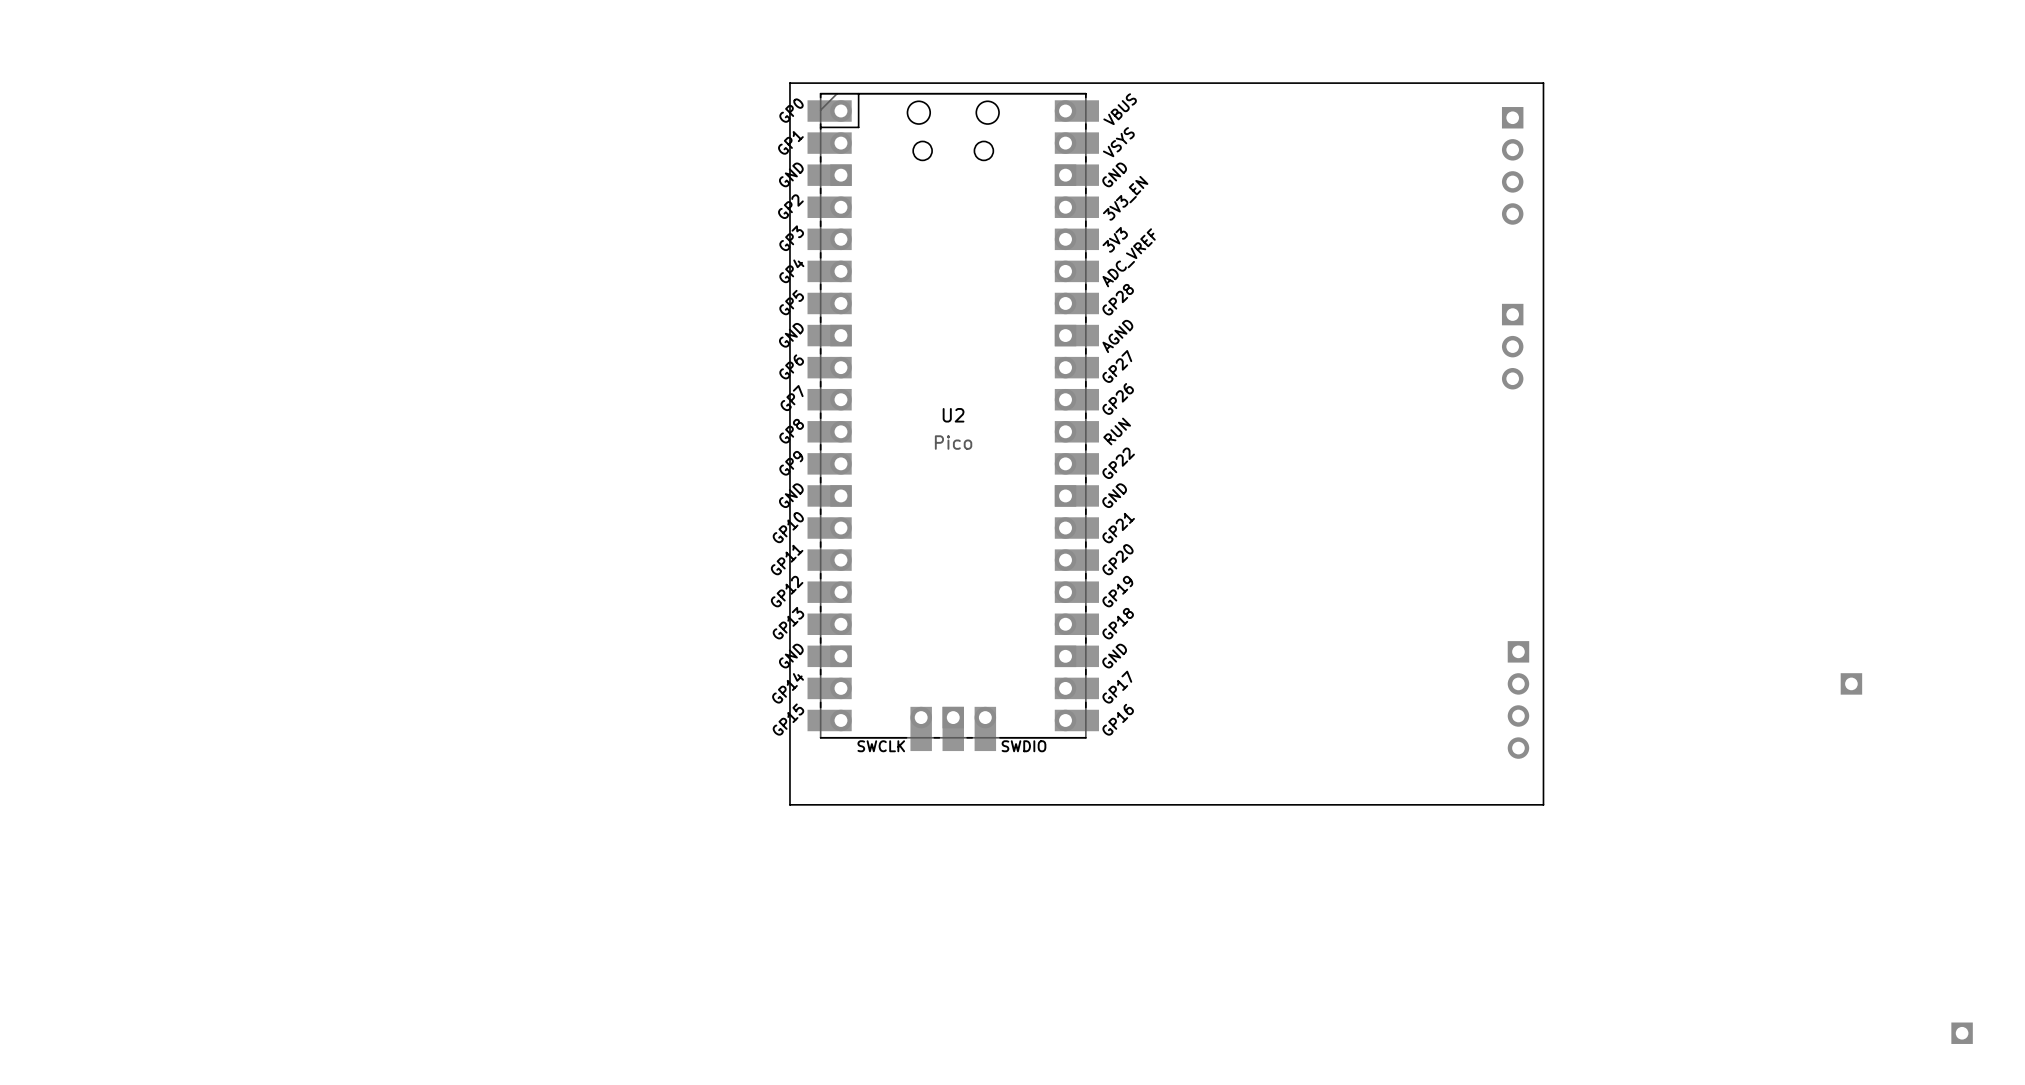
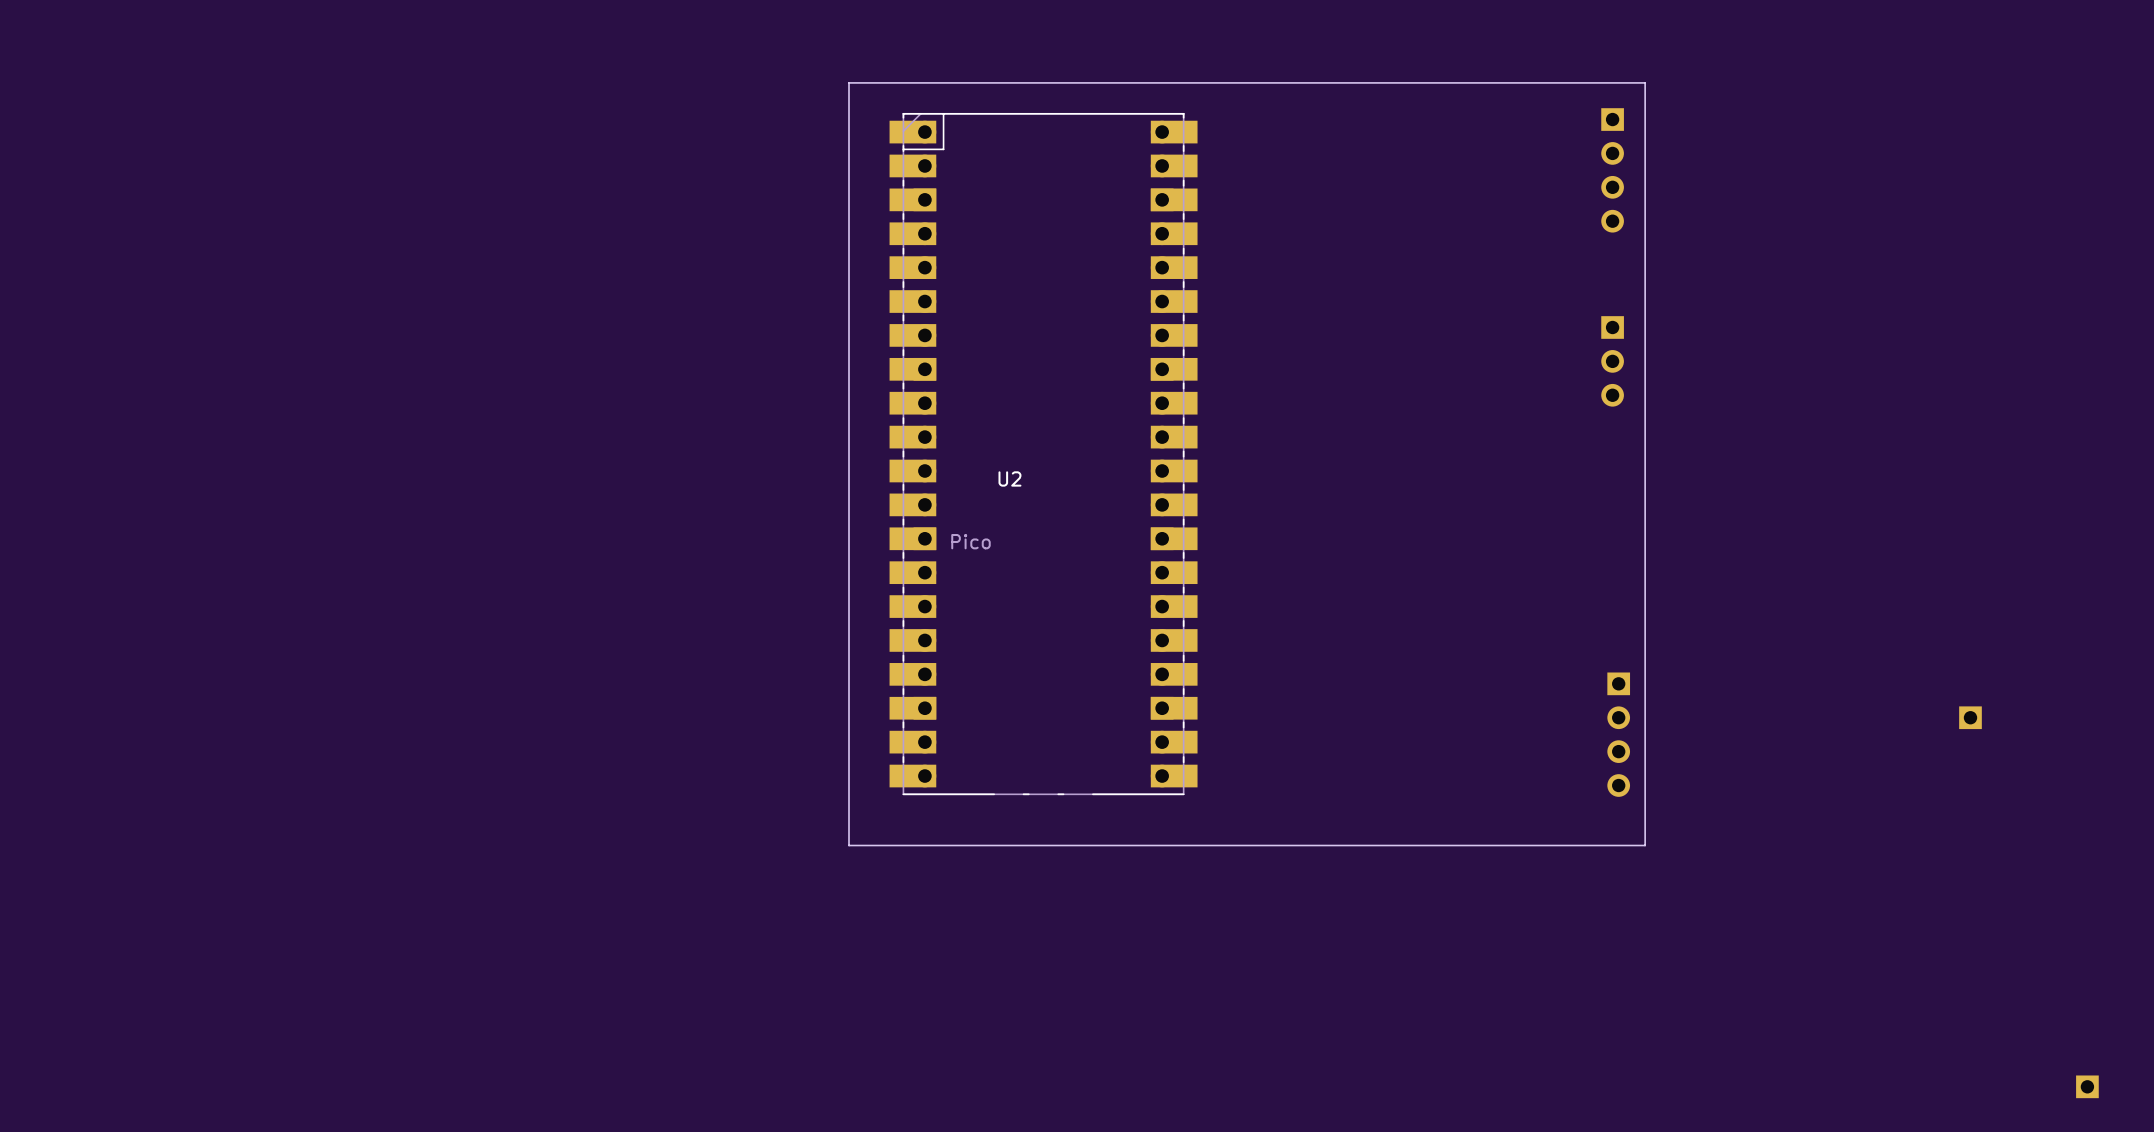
U2 footprint: [807, 92, 1099, 752] -> [889, 112, 1198, 796]
U2 name position: U2 (953, 415) -> U2 (1009, 478)
U2 value position: Pico (953, 442) -> Pico (970, 541)

